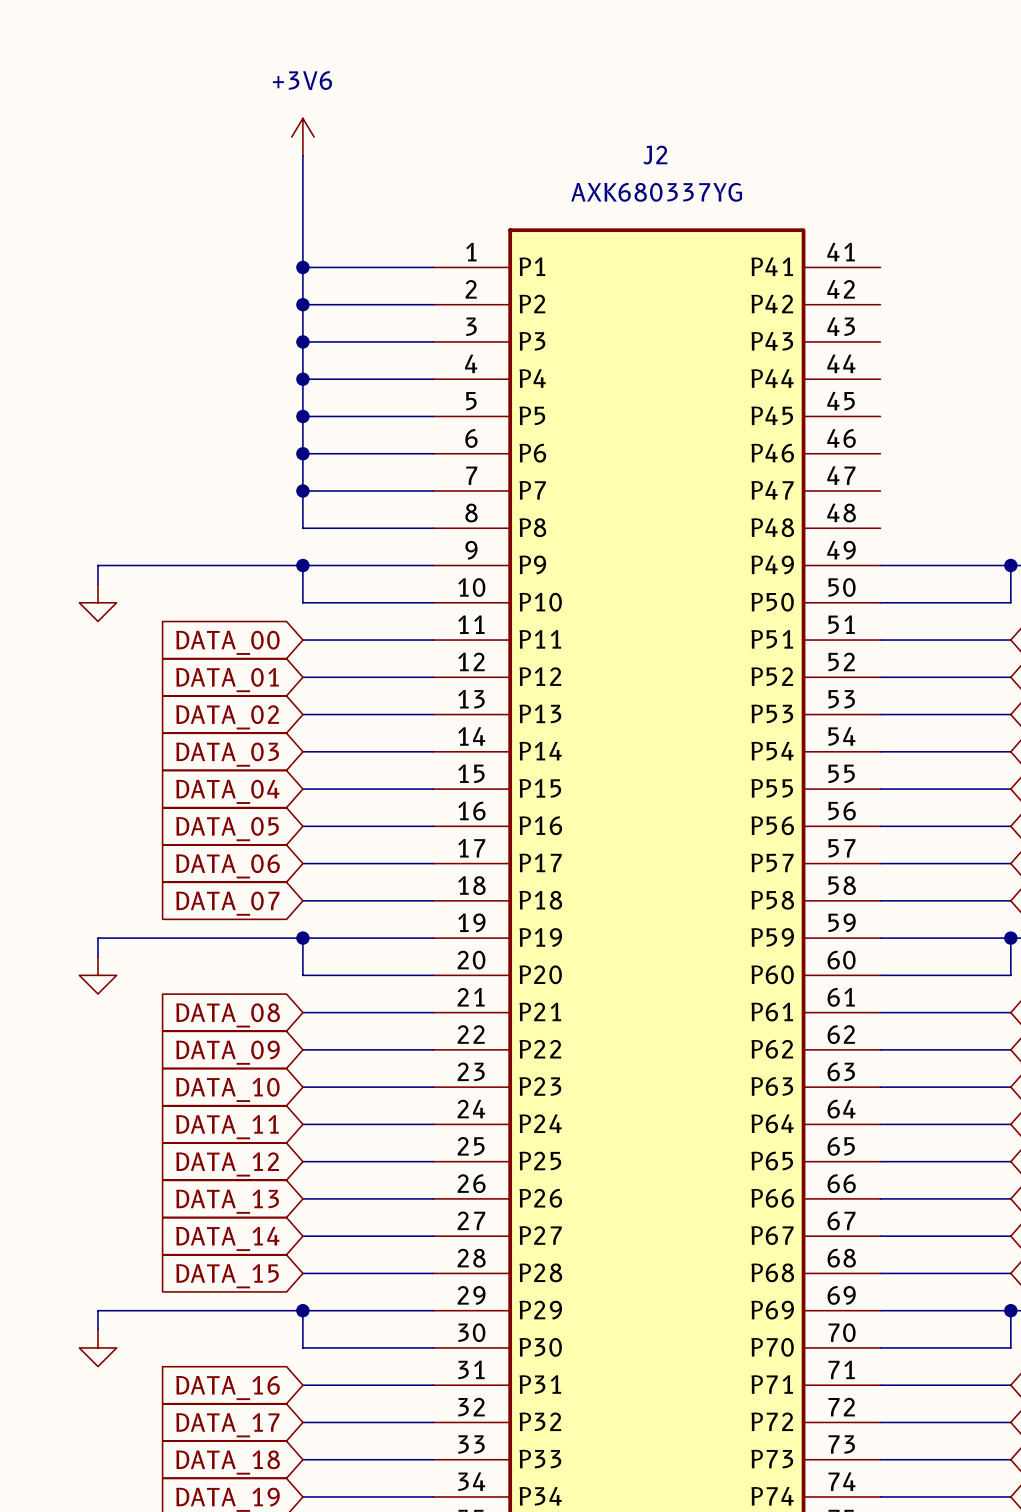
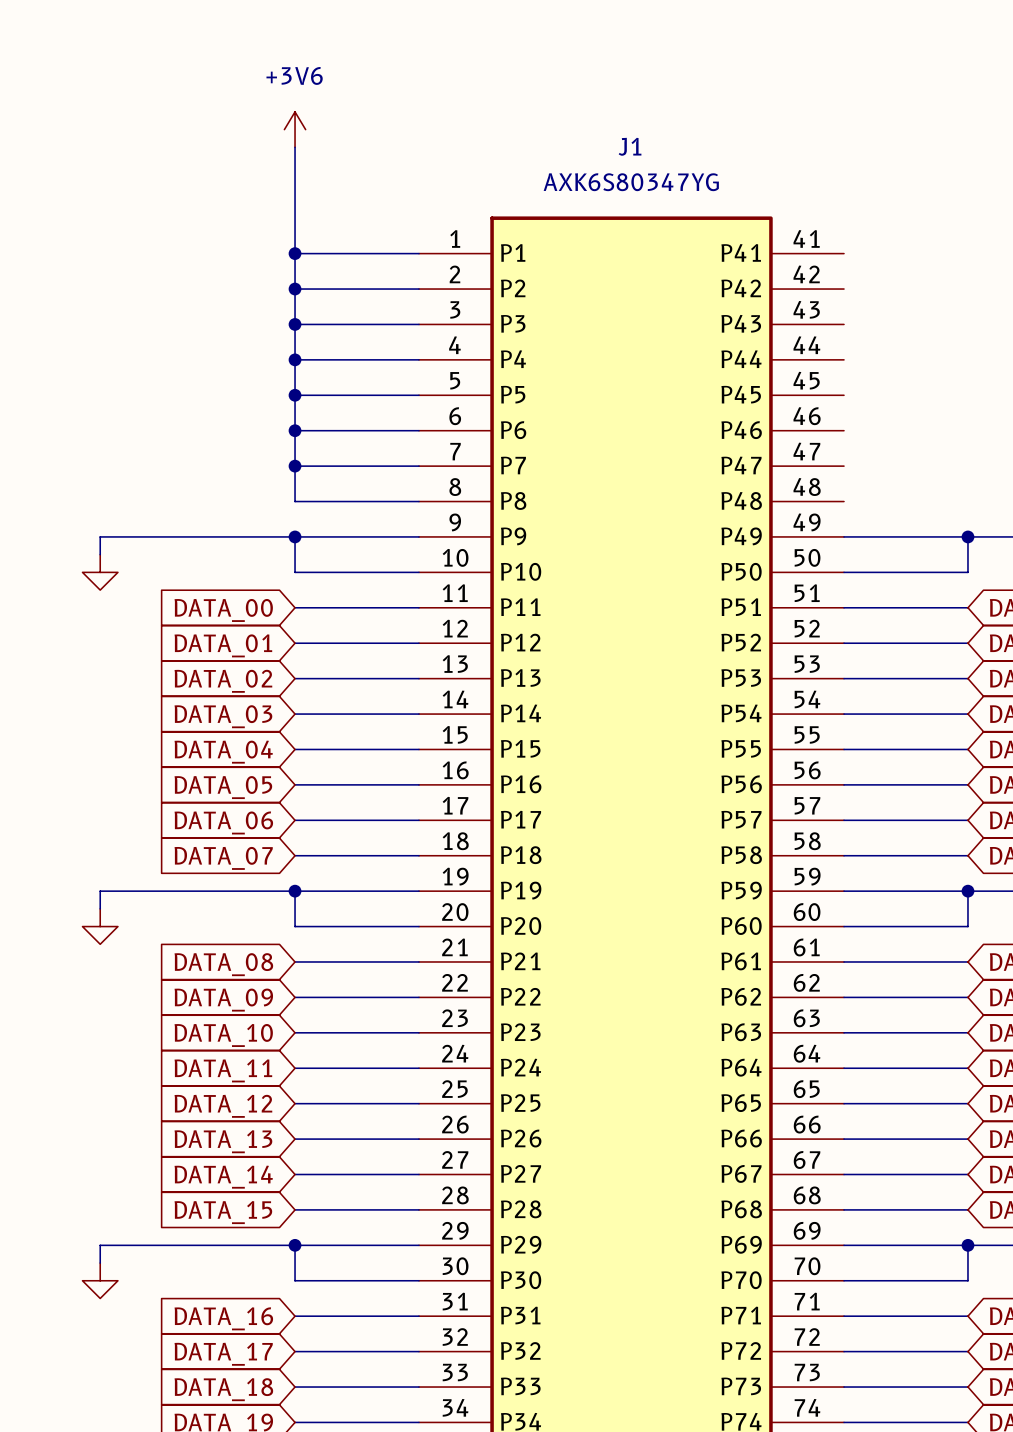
J2 name: J2 (655, 155) -> J1 (630, 146)
J2 value: AXK680337YG (656, 192) -> AXK6S80347YG (631, 182)

